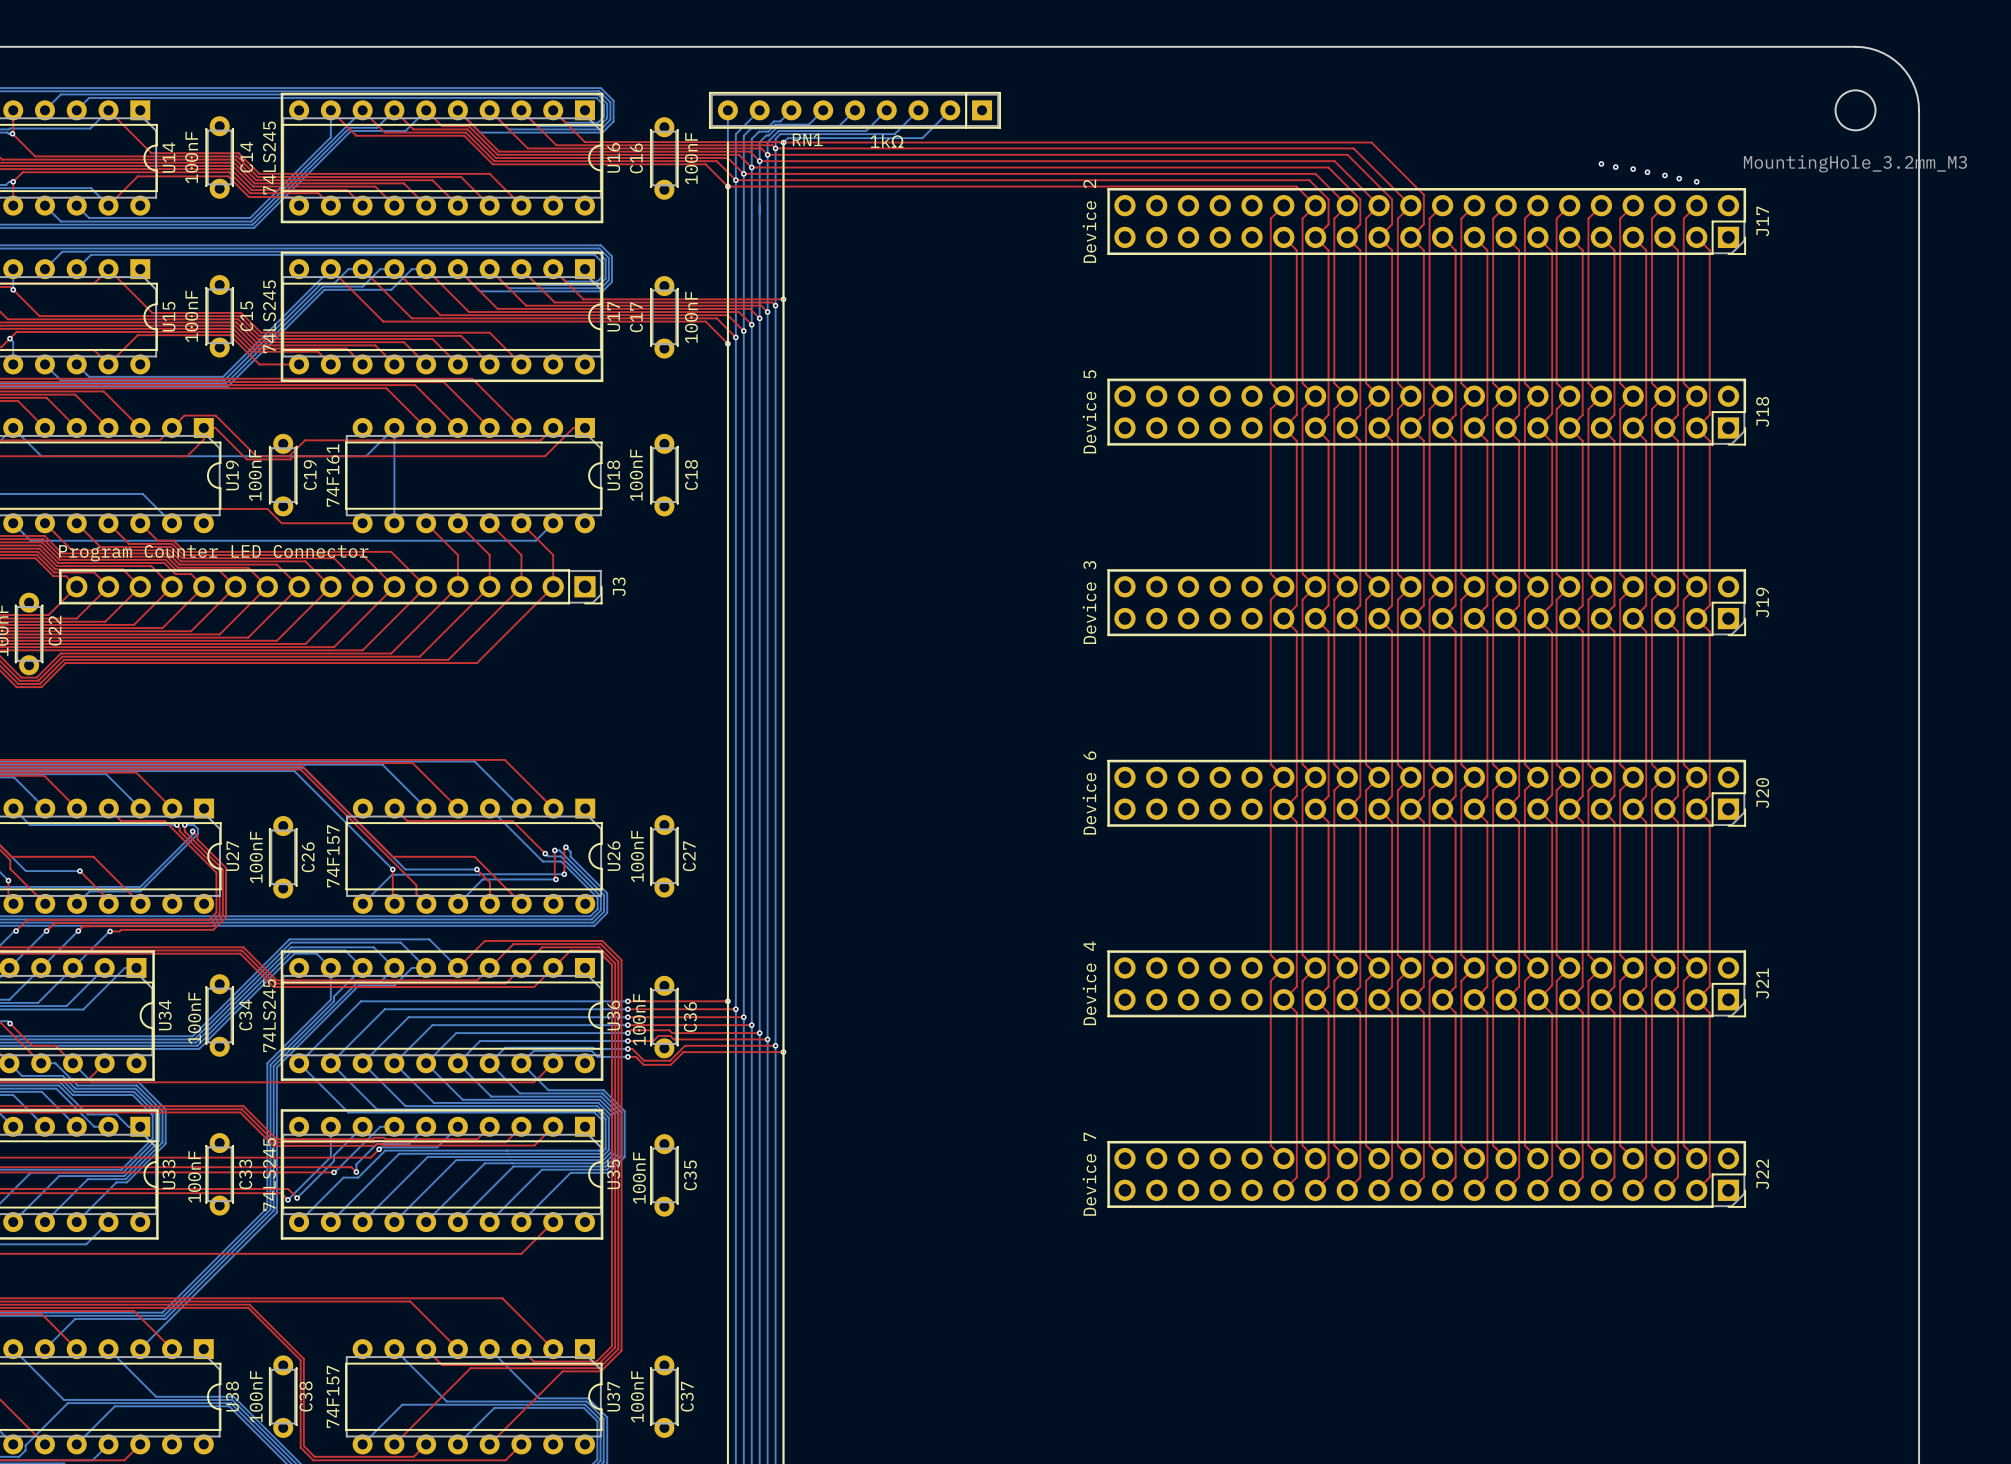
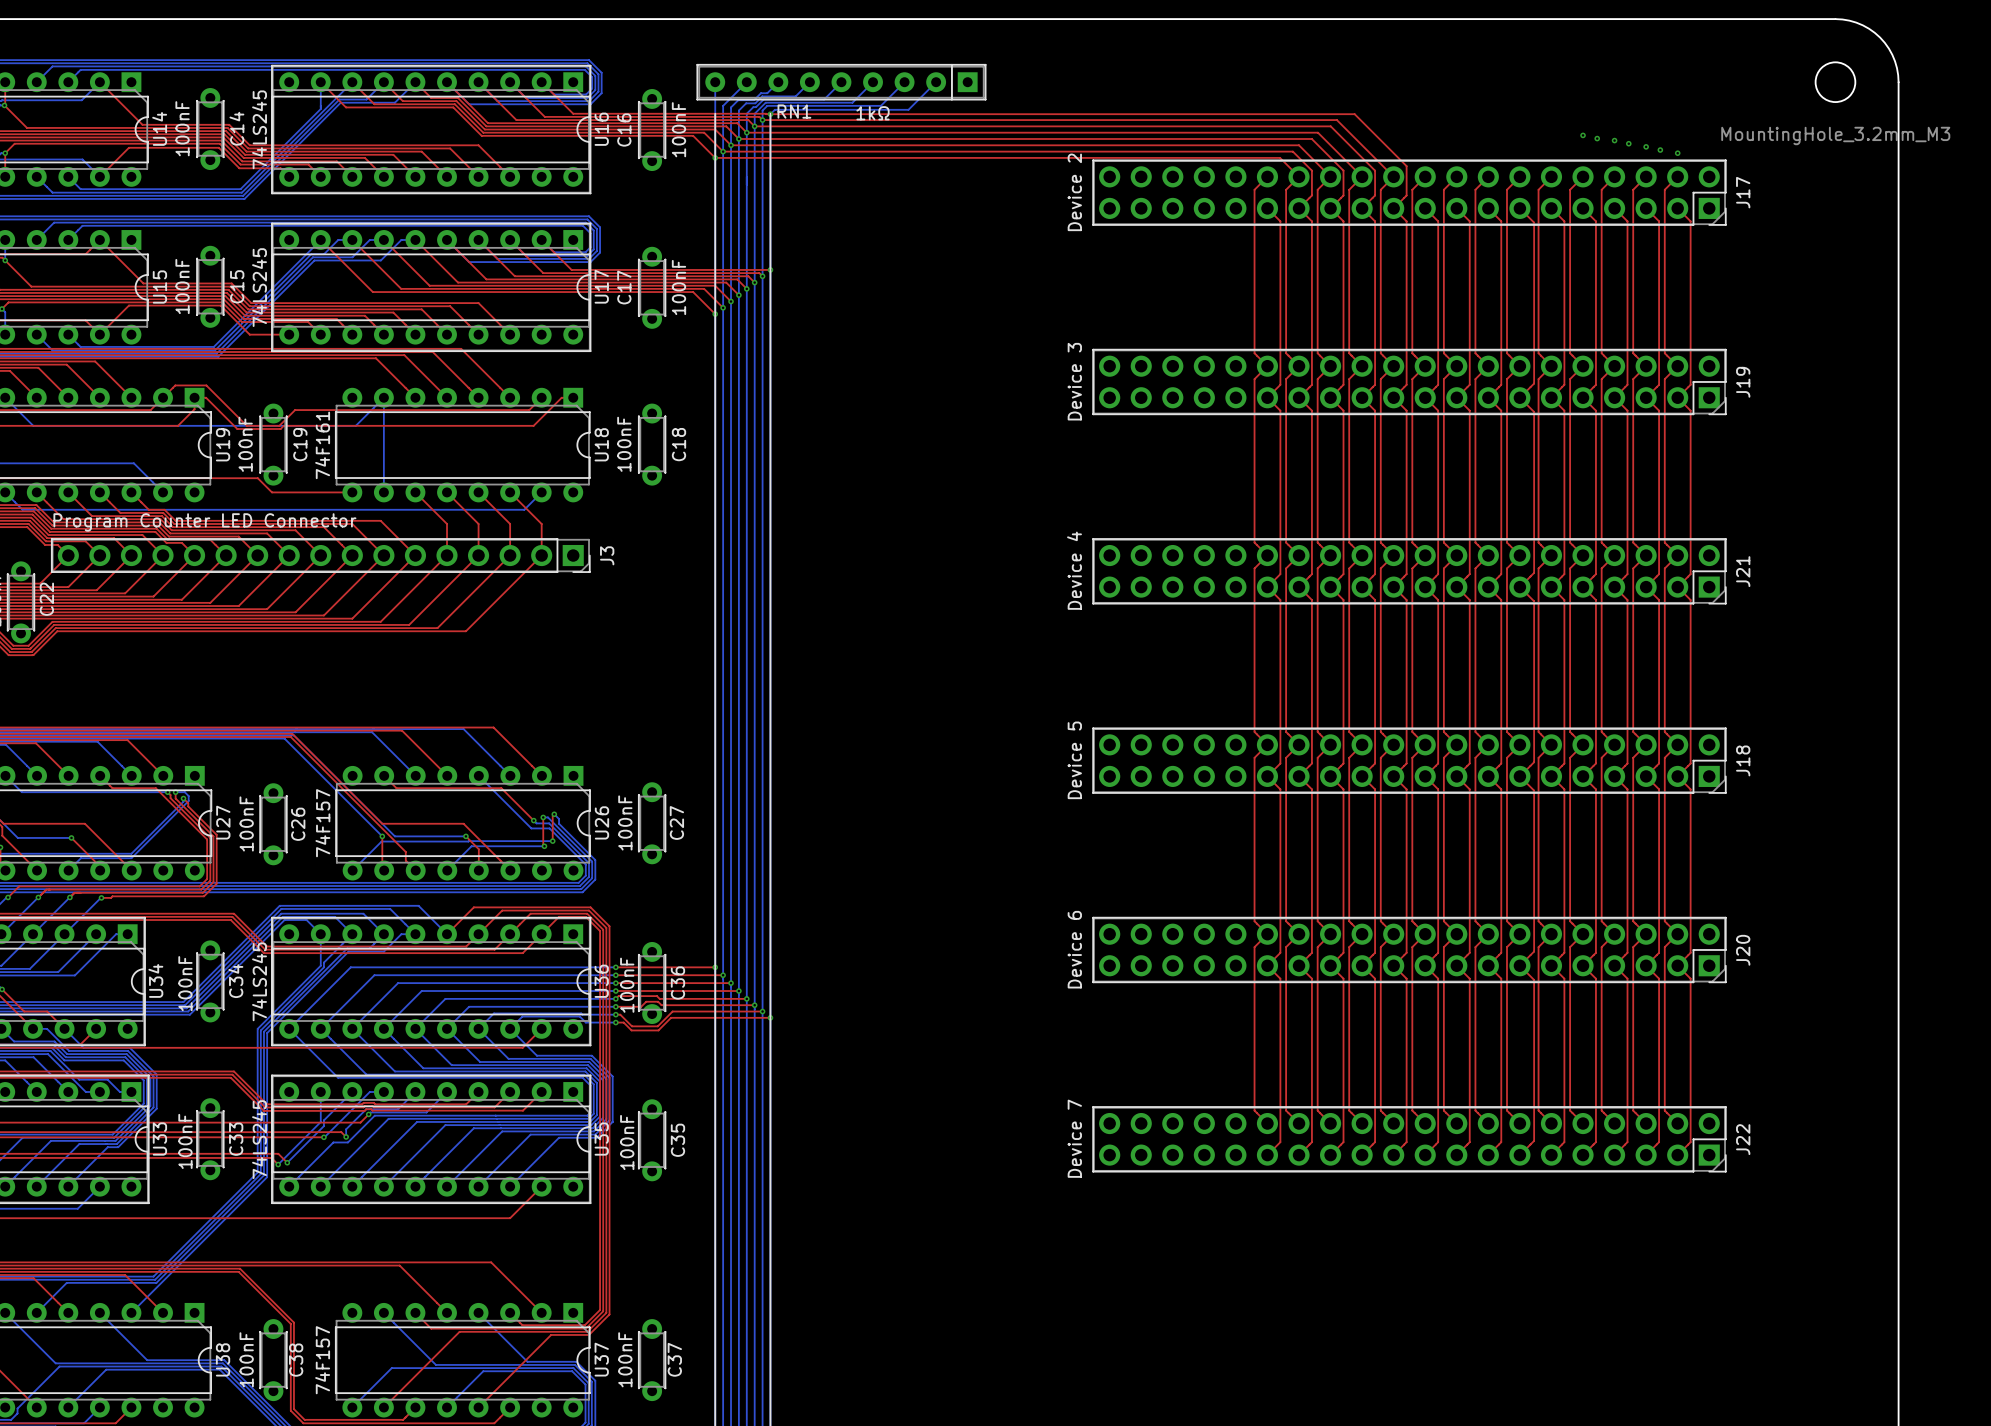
J18 value: Device 5 (1089, 411) -> Device 3 (1074, 381)
J18 name: J18 (1762, 411) -> J19 (1743, 382)
J19 value: Device 3 (1089, 602) -> Device 4 (1074, 570)
J19 name: J19 (1762, 602) -> J21 (1743, 571)
J20 value: Device 6 (1089, 792) -> Device 5 (1074, 760)
J20 name: J20 (1762, 793) -> J18 (1743, 760)
J21 value: Device 4 (1089, 983) -> Device 6 (1074, 949)
J21 name: J21 (1762, 983) -> J20 (1743, 950)

